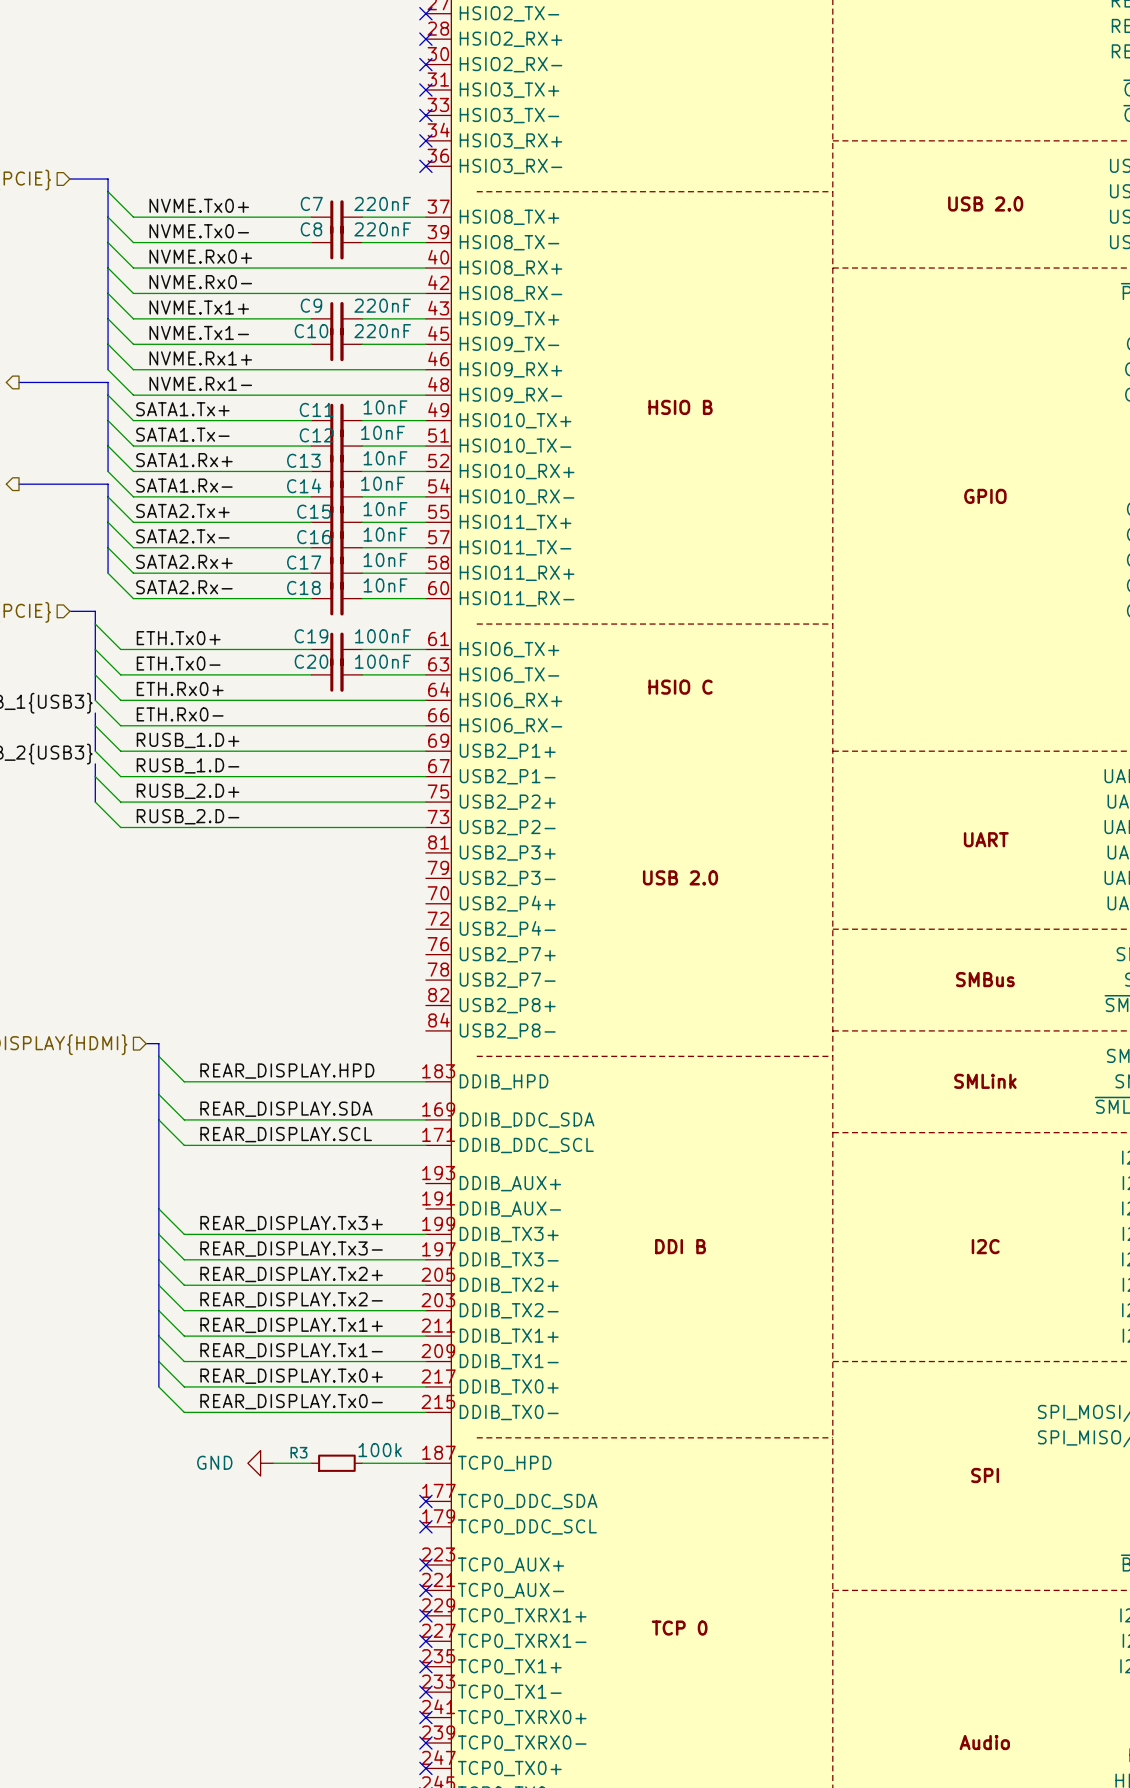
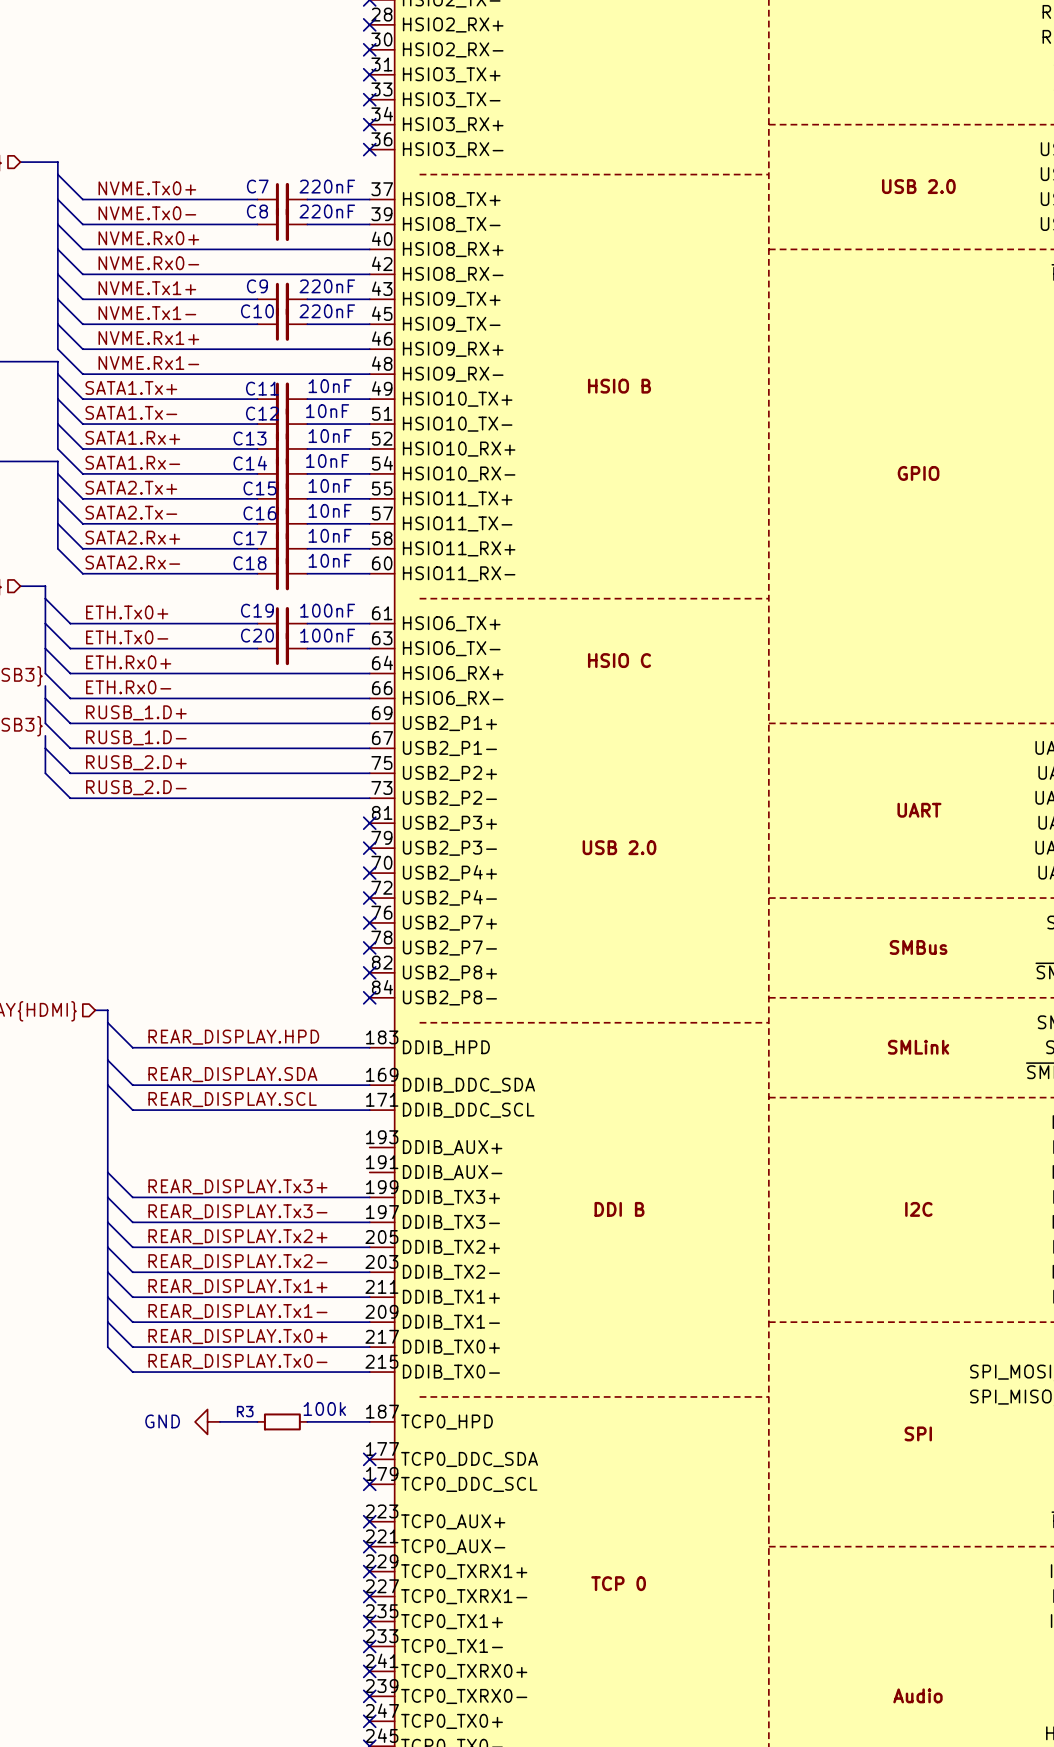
no-connect mark: none -> (369, 823)
no-connect mark: none -> (369, 848)
no-connect mark: none -> (369, 873)
no-connect mark: none -> (369, 898)
no-connect mark: none -> (369, 922)
no-connect mark: none -> (369, 947)
no-connect mark: none -> (369, 972)
no-connect mark: none -> (369, 997)

